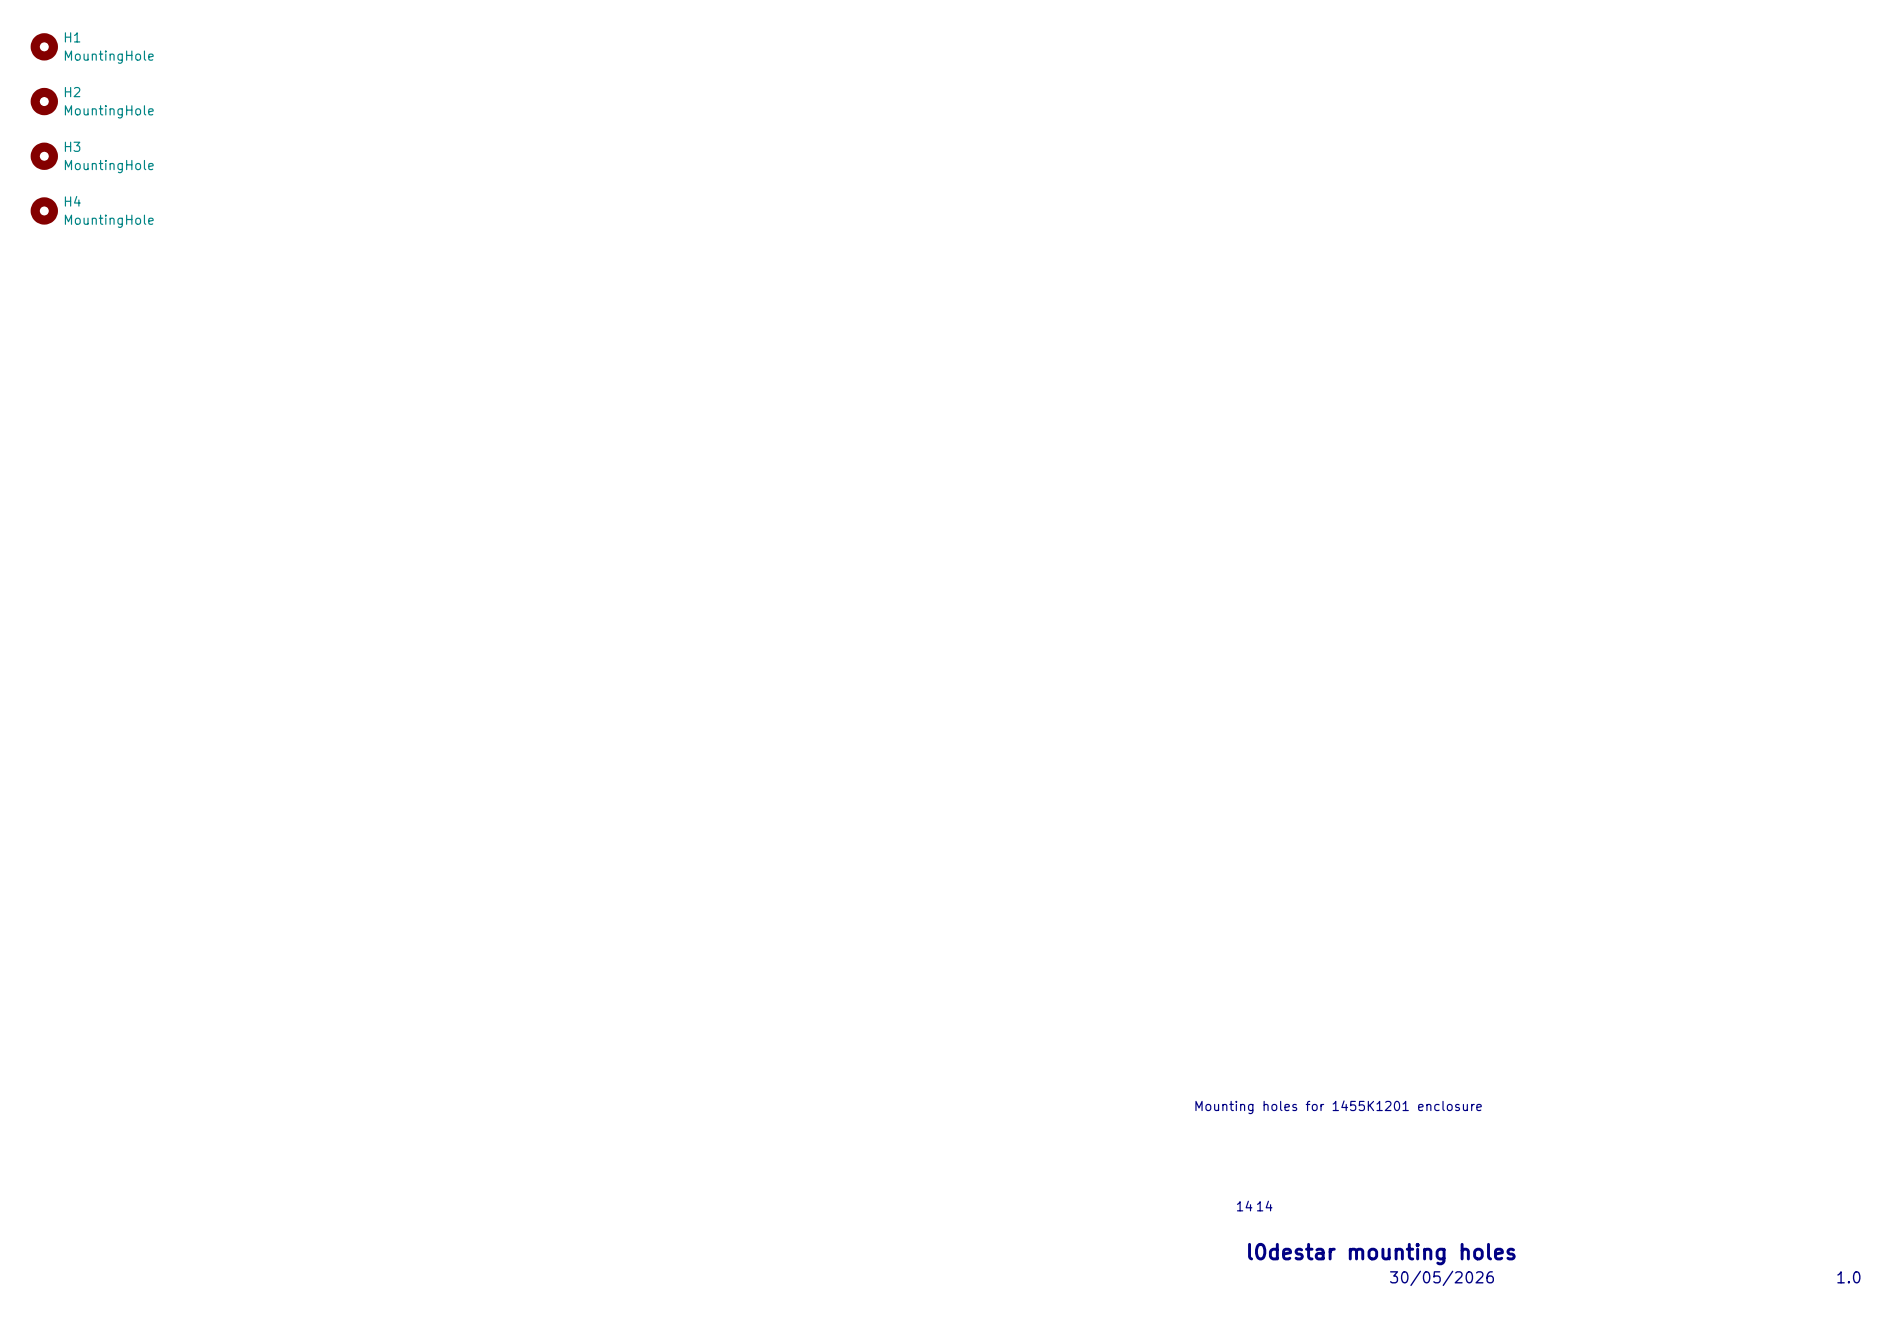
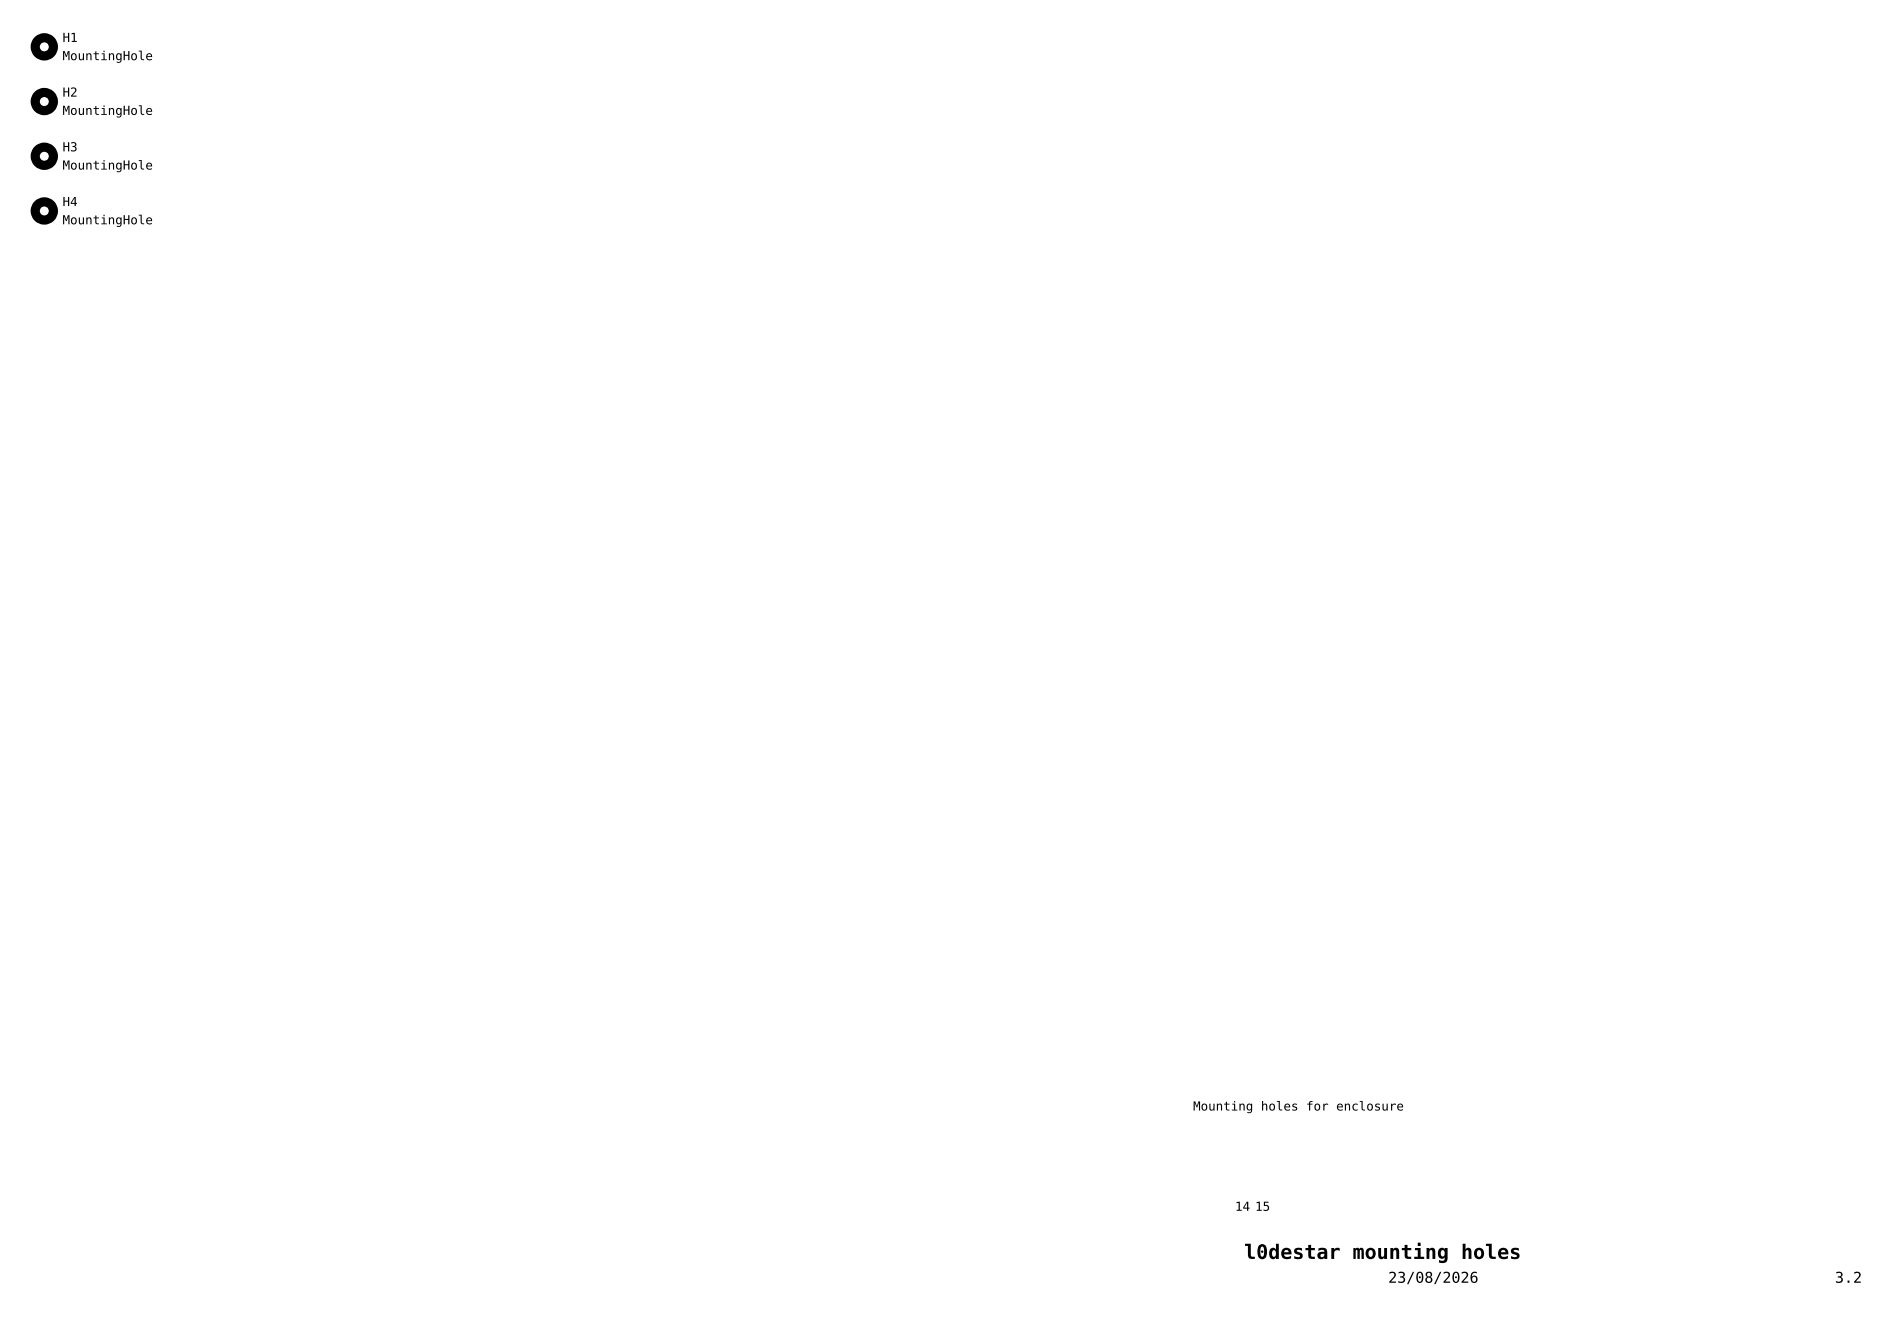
text: Mounting holes for 1455K1201 enclosure (1338, 1107) -> Mounting holes for enclosure (1298, 1107)
text: 14 (1264, 1206) -> 15 (1262, 1206)
text: 1.0 (1848, 1277) -> 3.2 (1848, 1277)
text: 30/05/2026 (1441, 1278) -> 23/08/2026 (1433, 1277)

